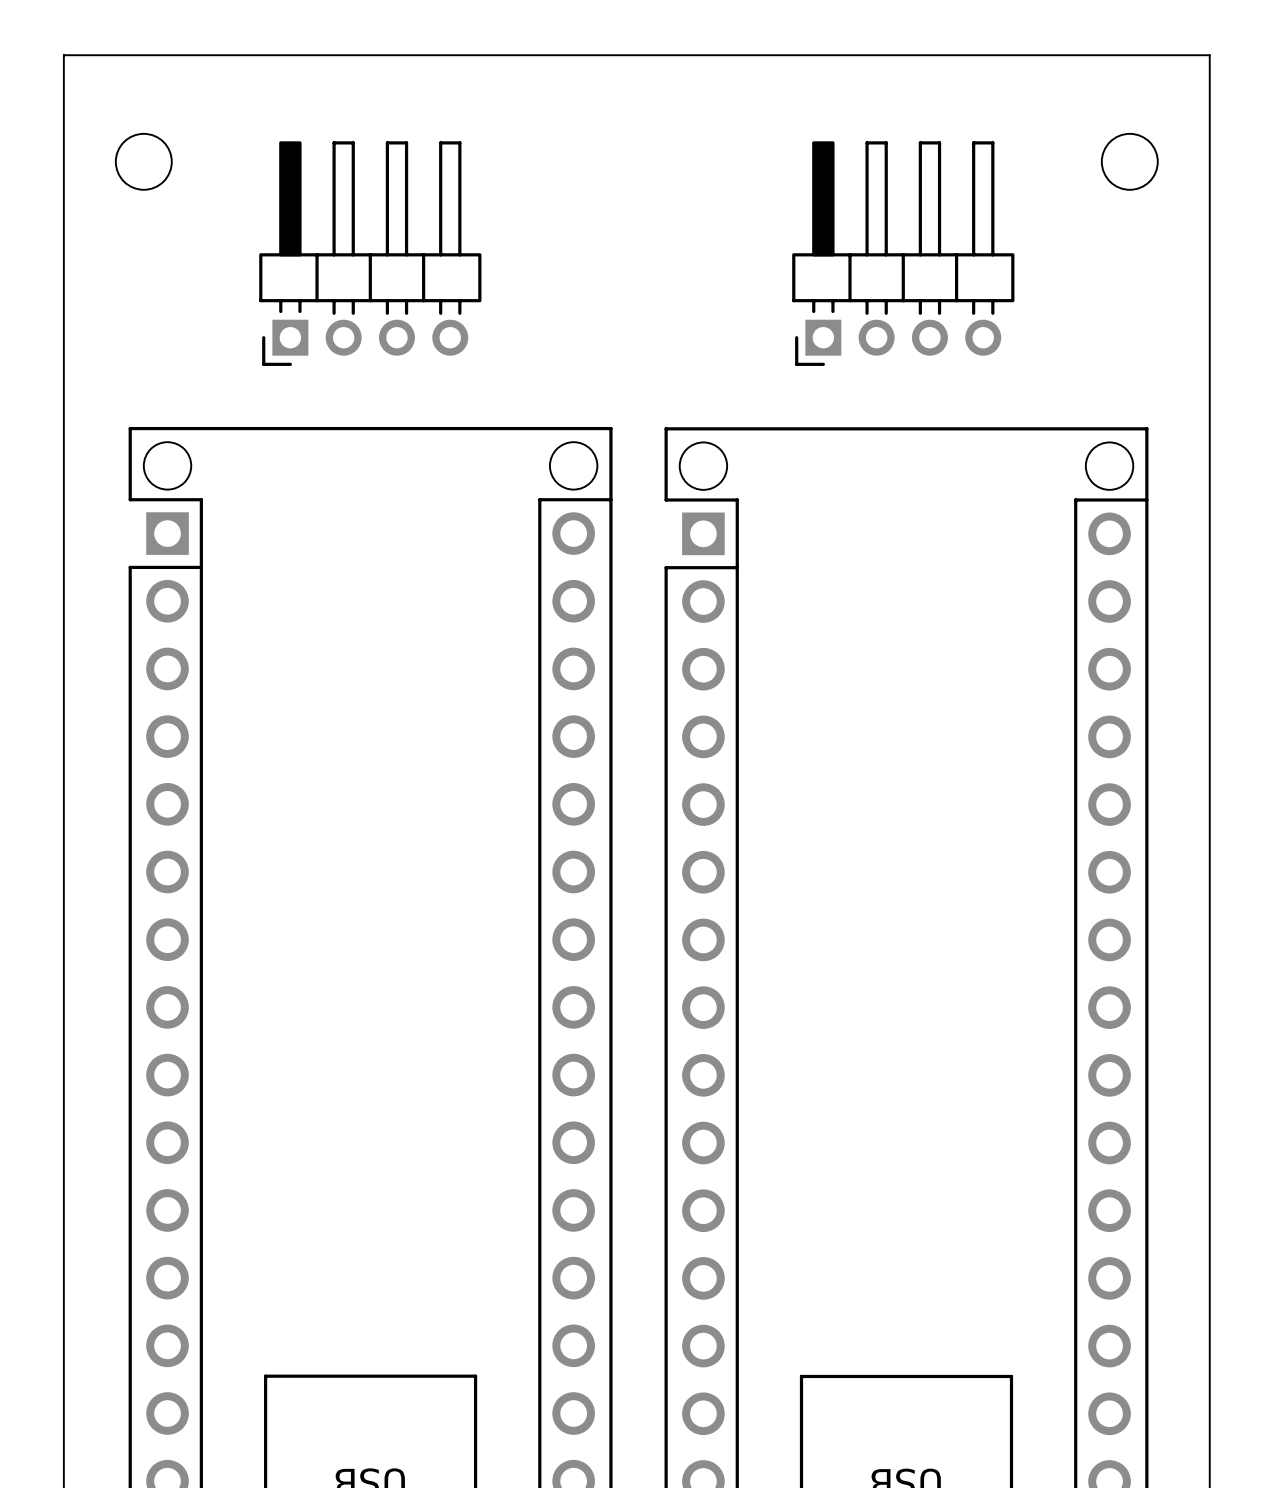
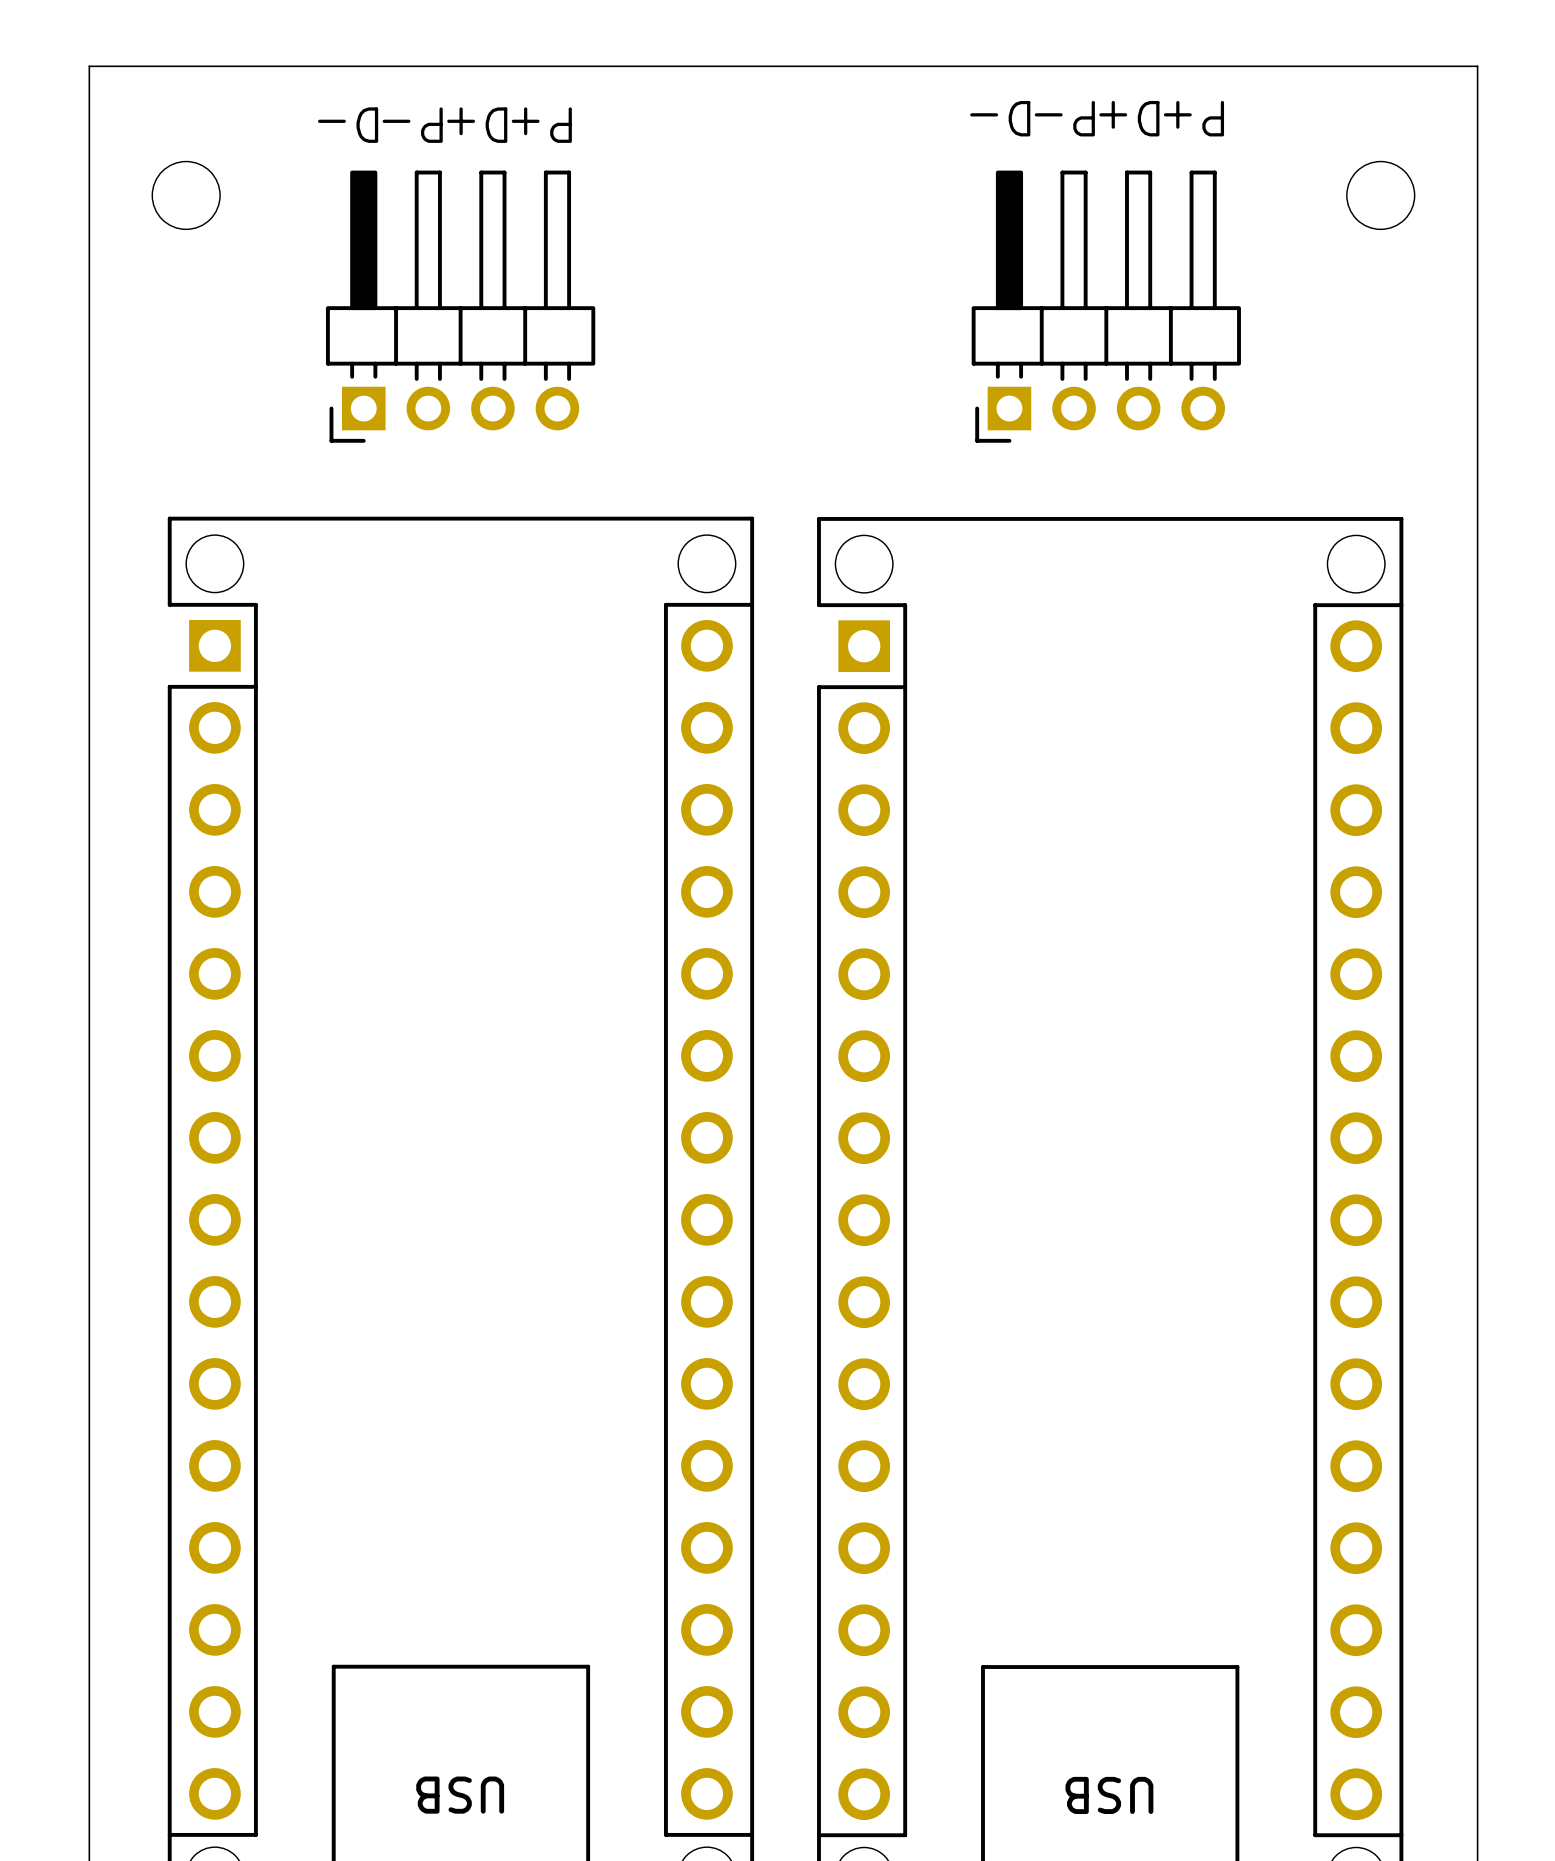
text: none -> D- (1000, 118)
text: none -> P- (1064, 118)
text: none -> D+ (1129, 118)
text: none -> P+ (1193, 118)
text: none -> D- (348, 125)
text: none -> P- (412, 125)
text: none -> D+ (477, 125)
text: none -> P+ (541, 125)

